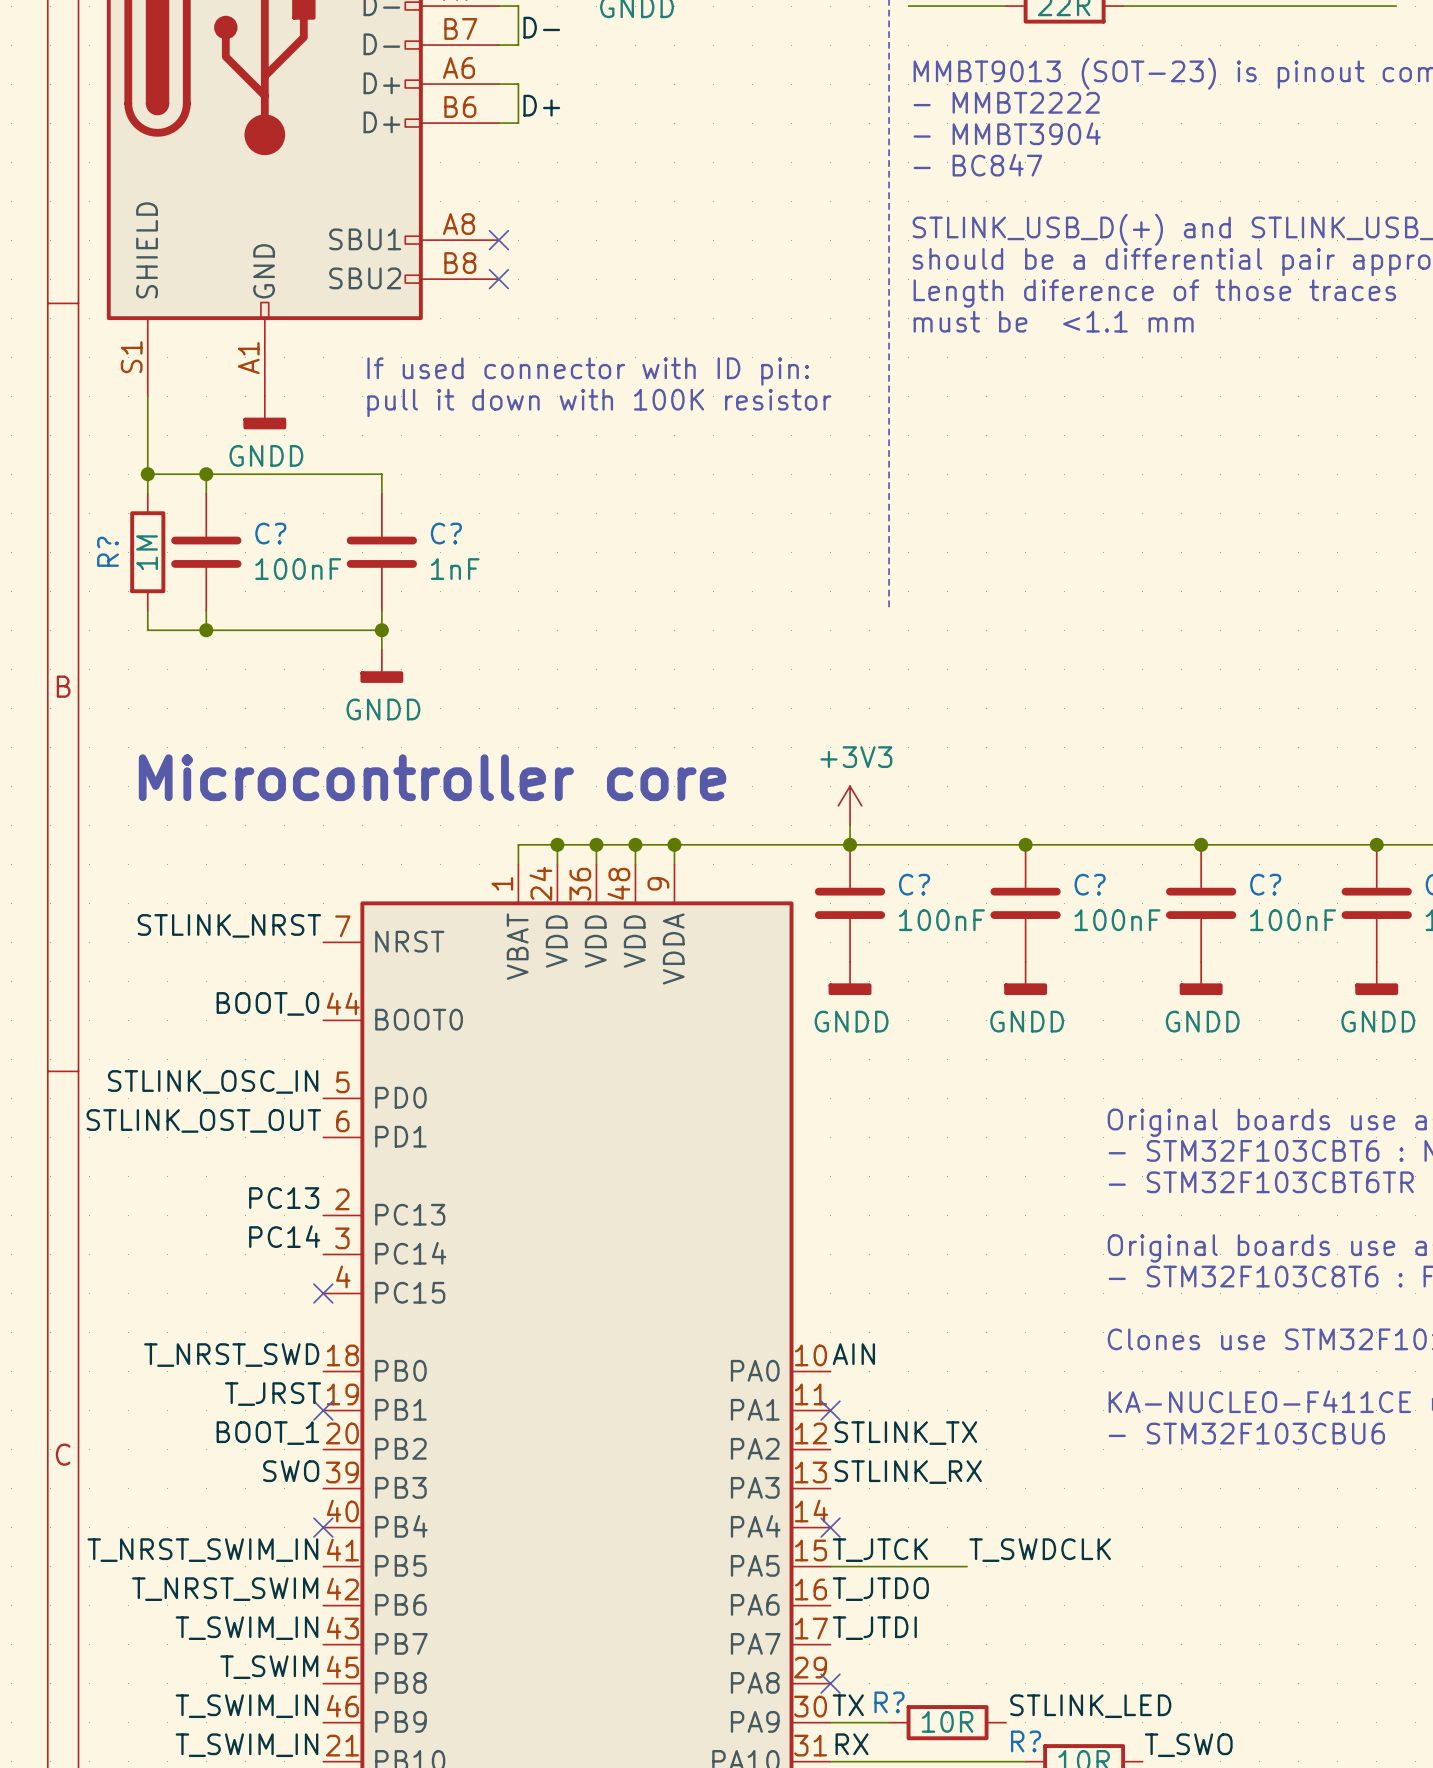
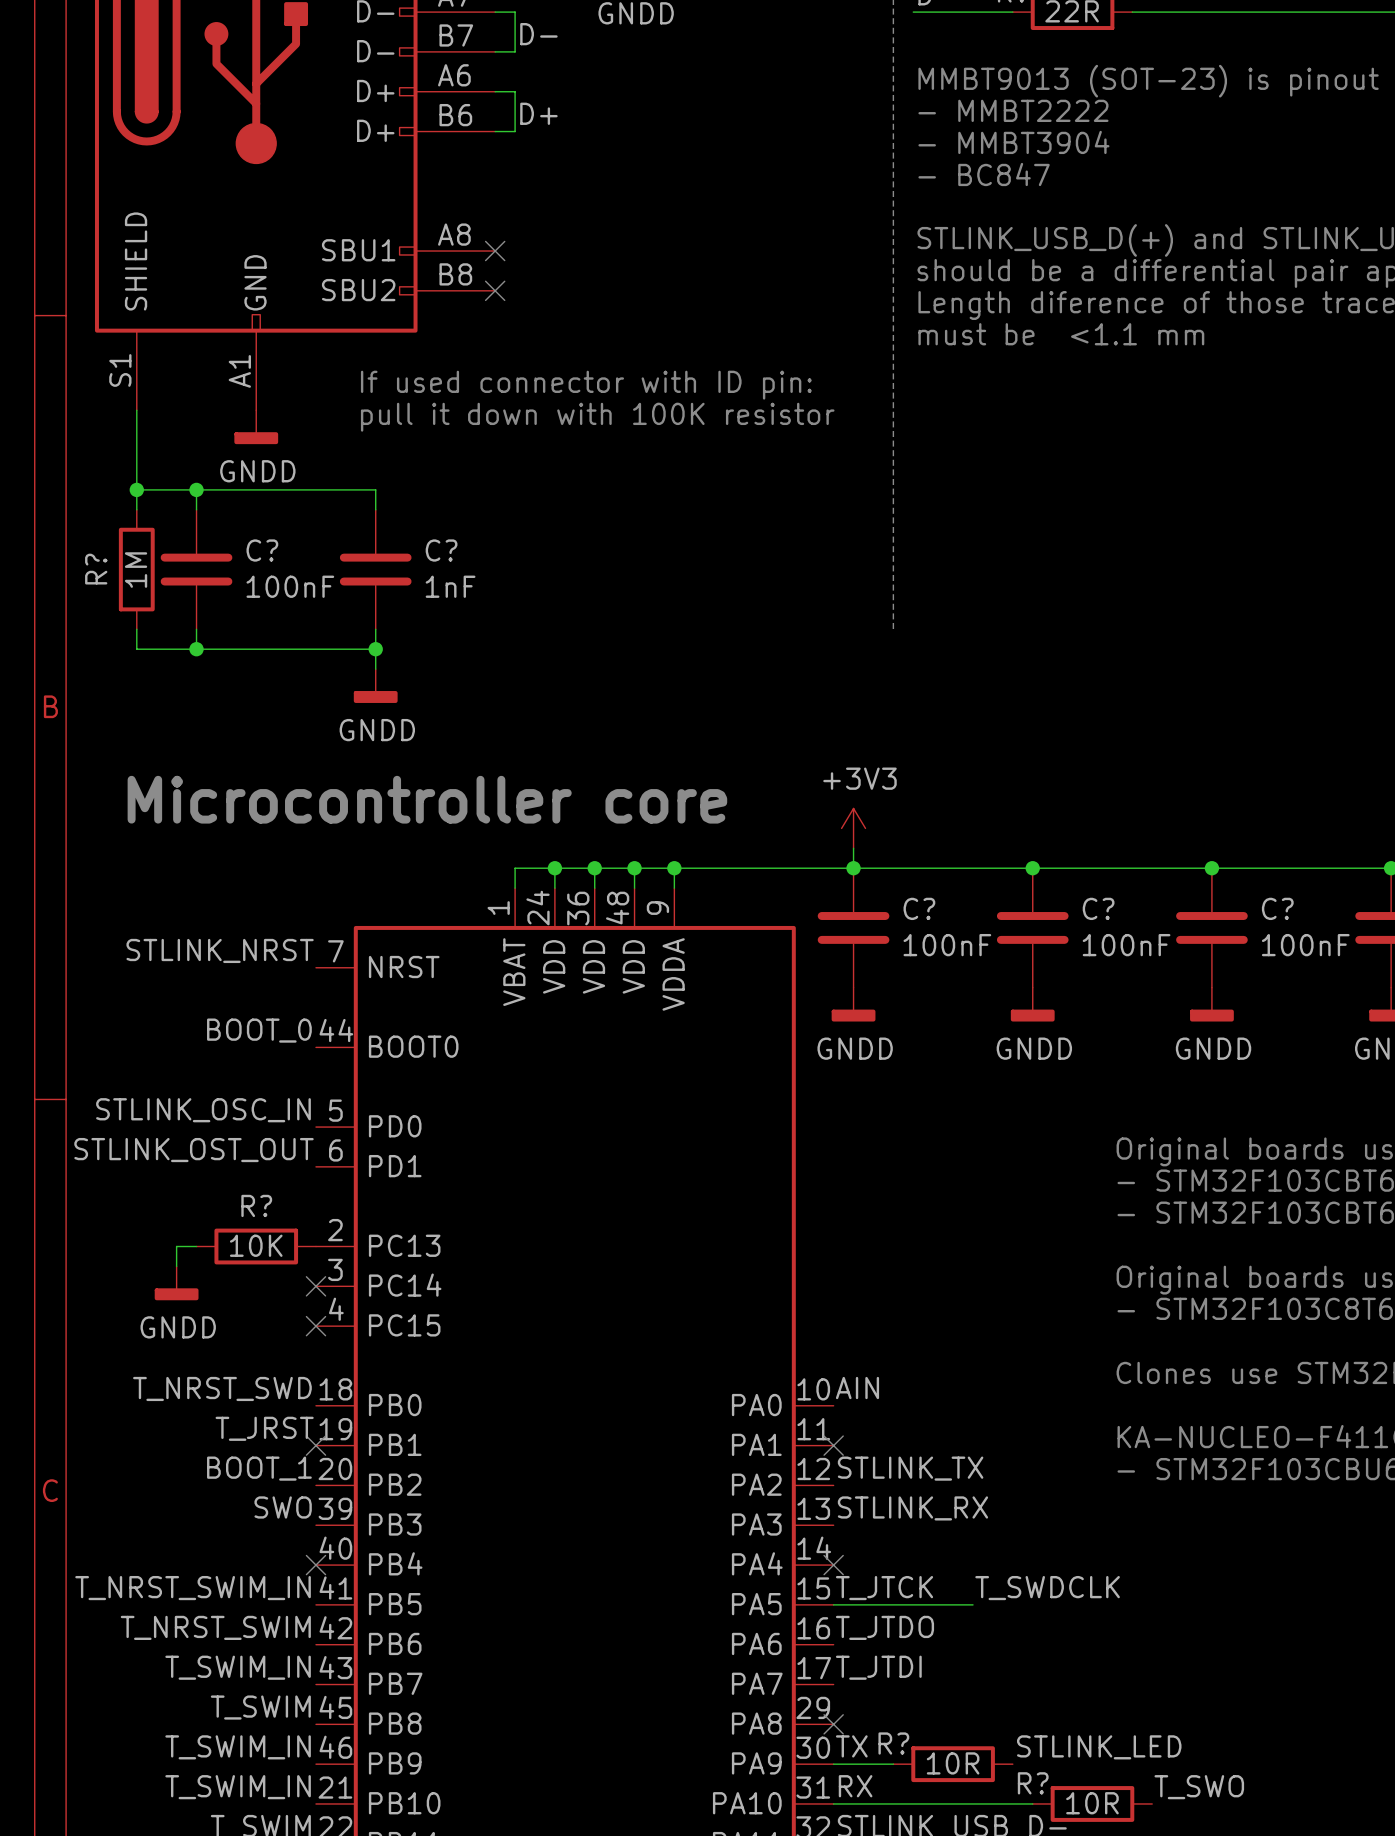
label: PC13 (284, 1198) -> none
wire: none -> (196, 1246) (176, 1246) (176, 1266)
R?: none -> 10K (256, 1246)
label: PC14 (284, 1236) -> none
power symbol: none -> GNDD (176, 1283)
no-connect mark: none -> (315, 1286)

